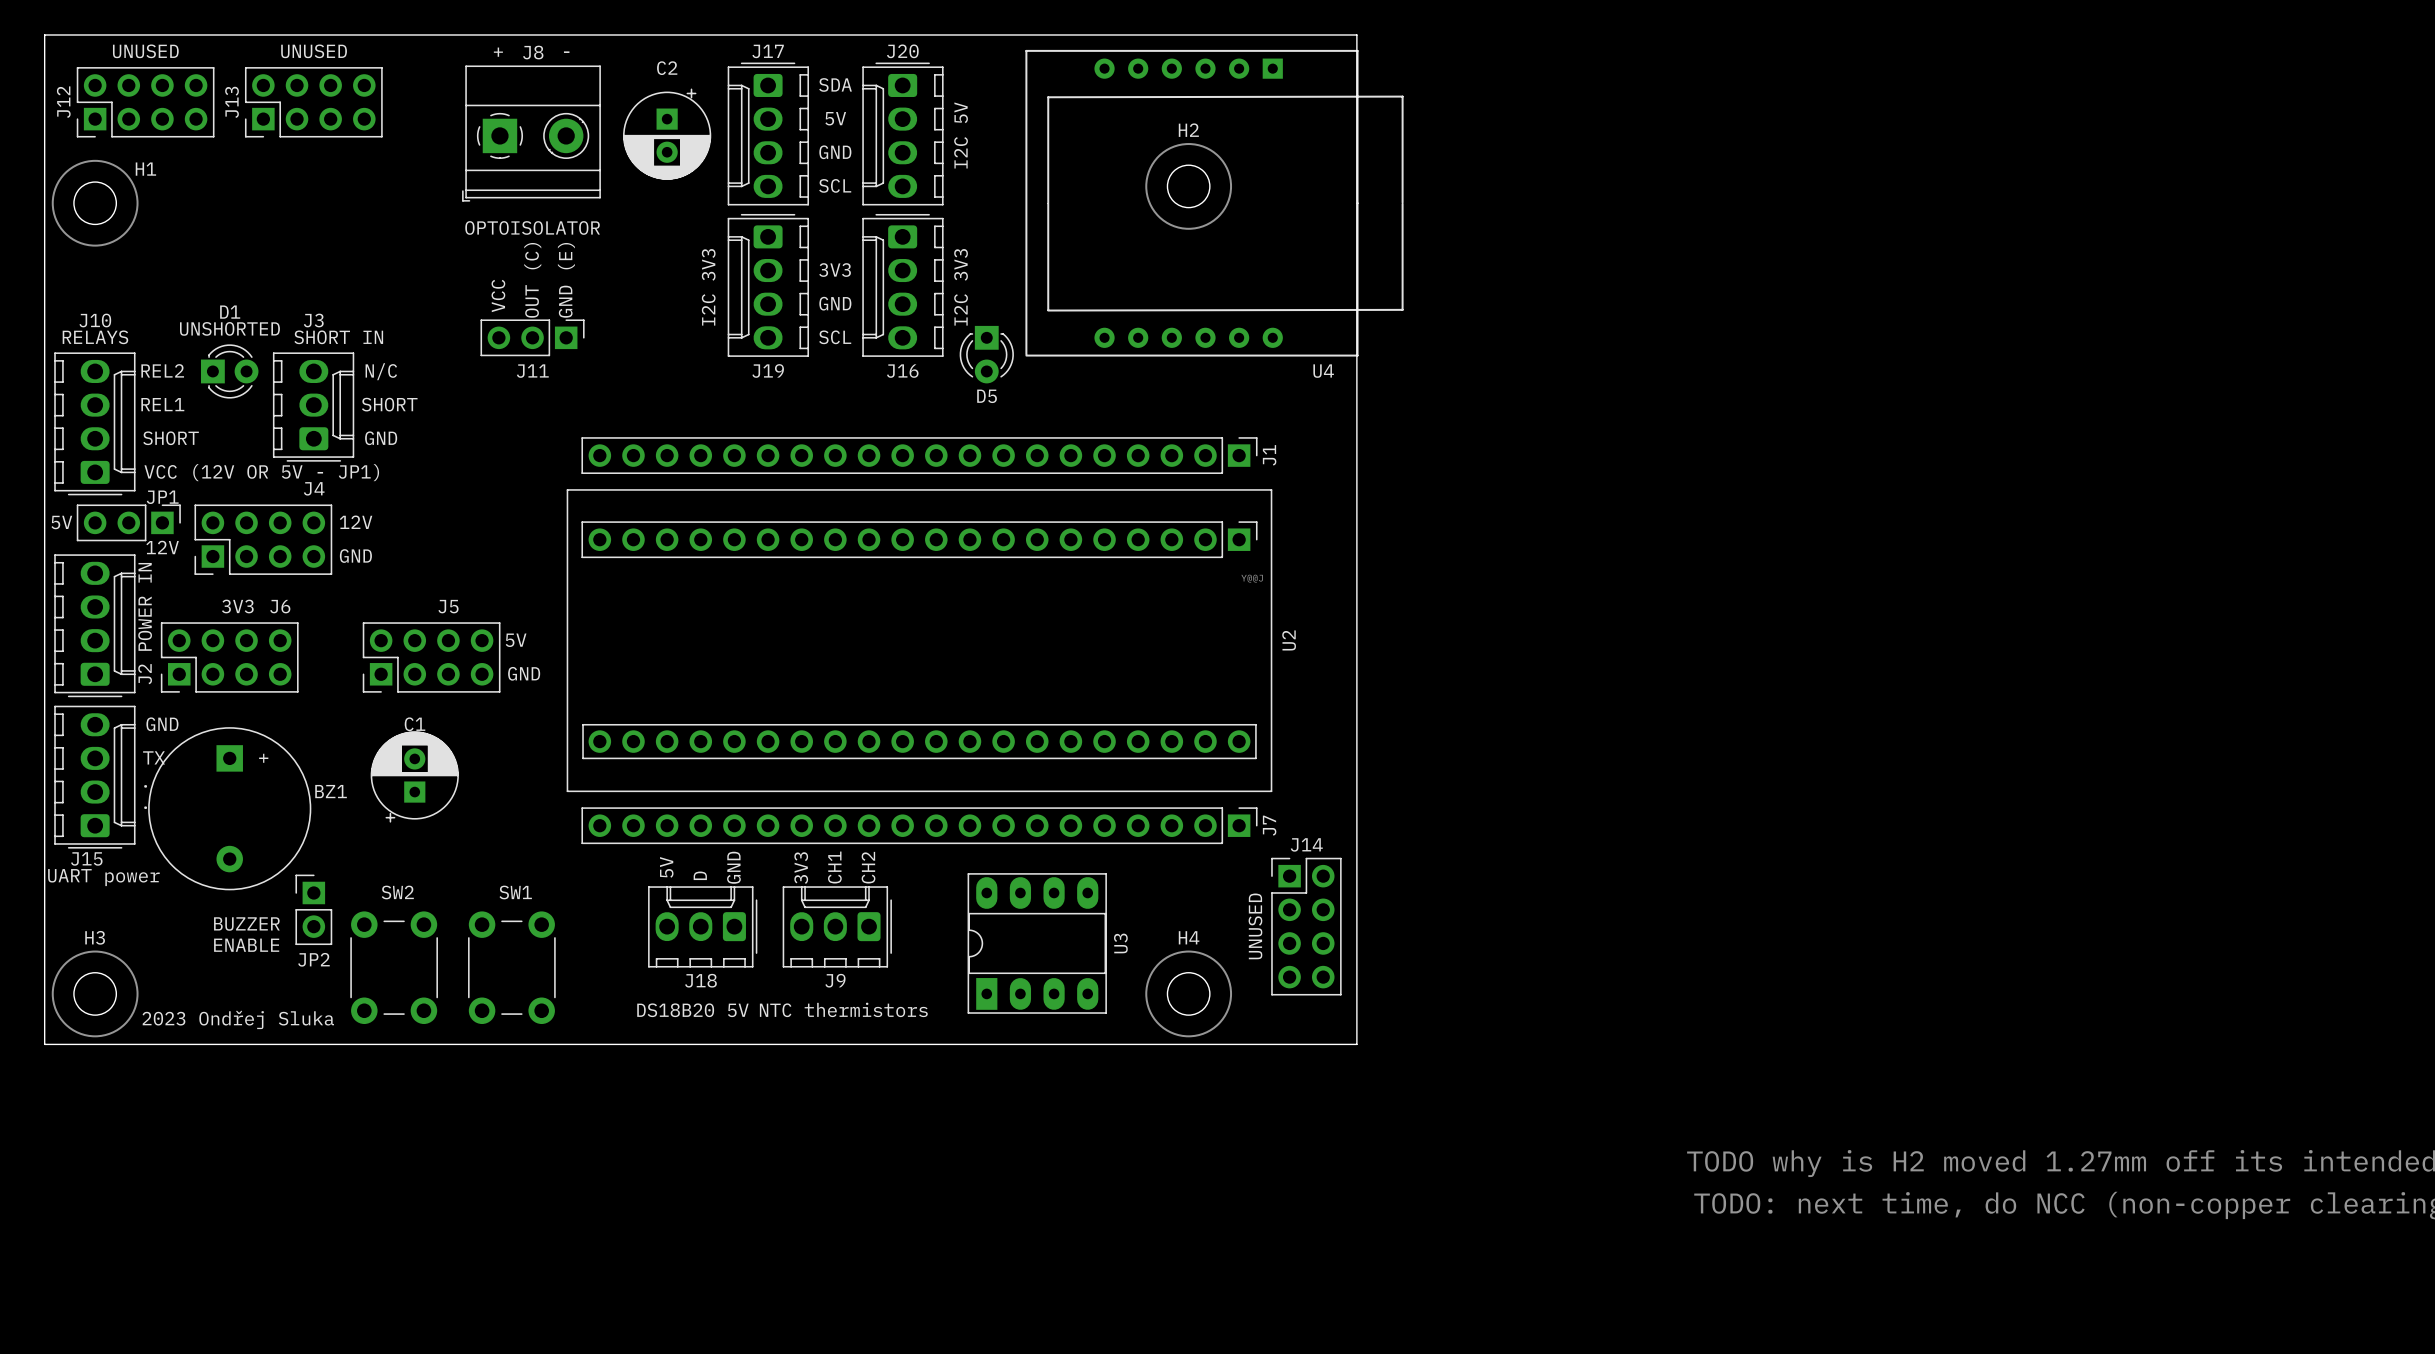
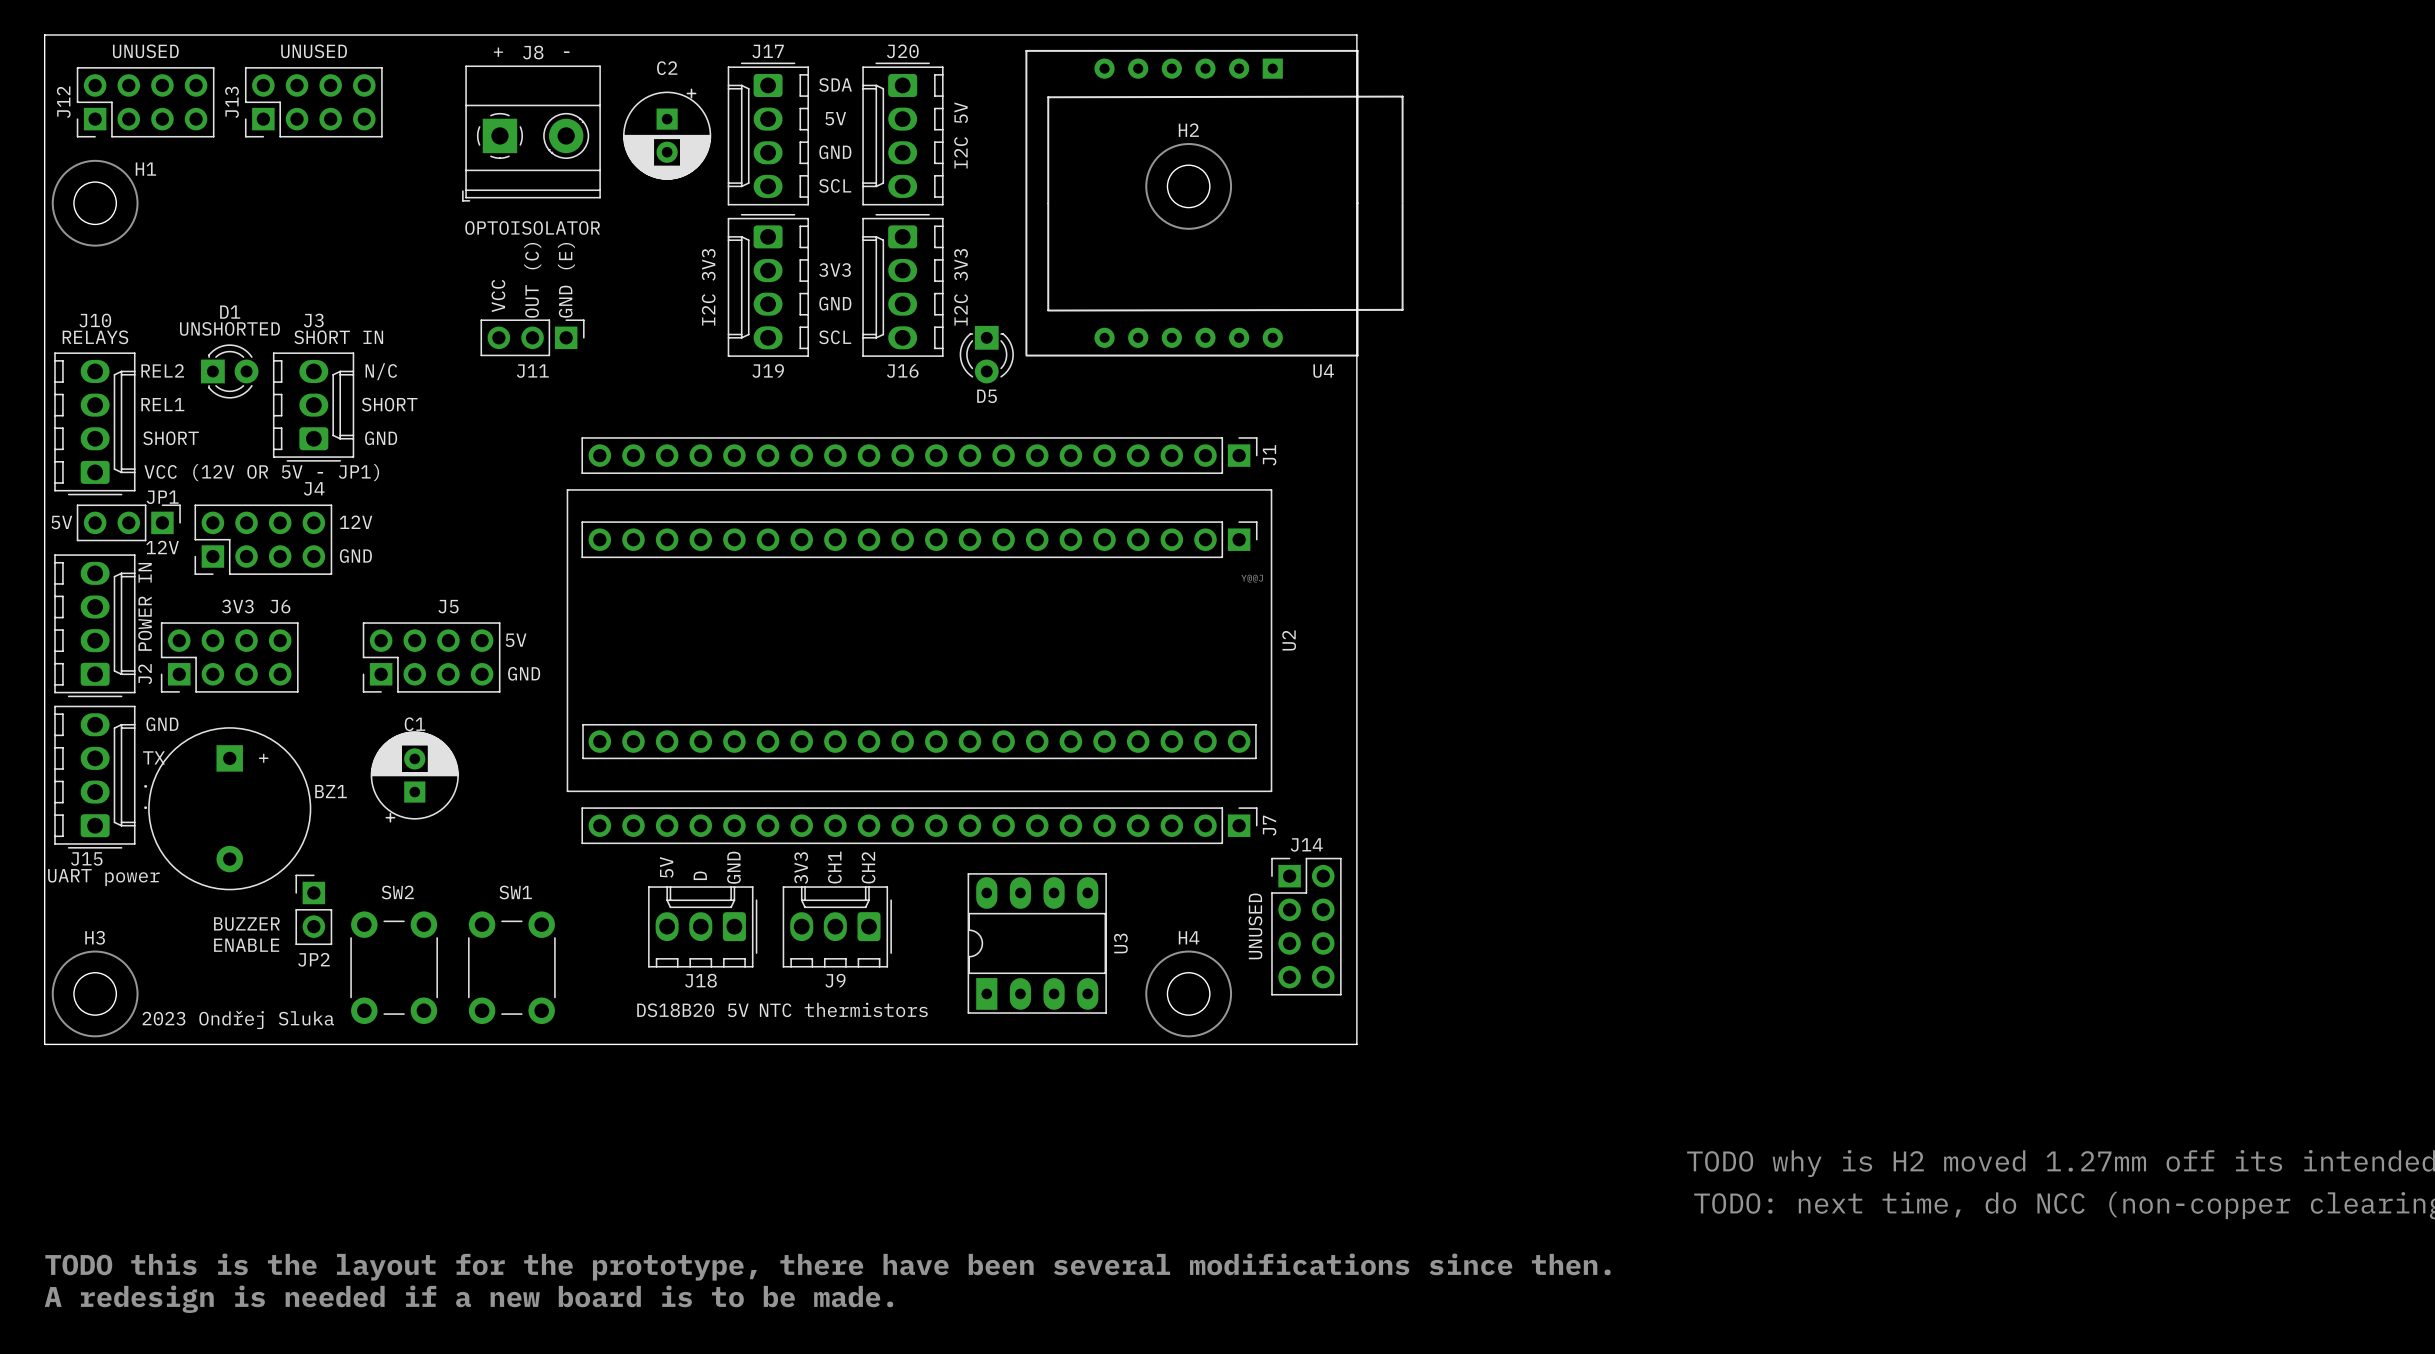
text: none -> TODO this is the layout for the prototype, there have been several modifications since then. (827, 1267)
text: none -> A redesign is needed if a new board is to be made. (468, 1299)

